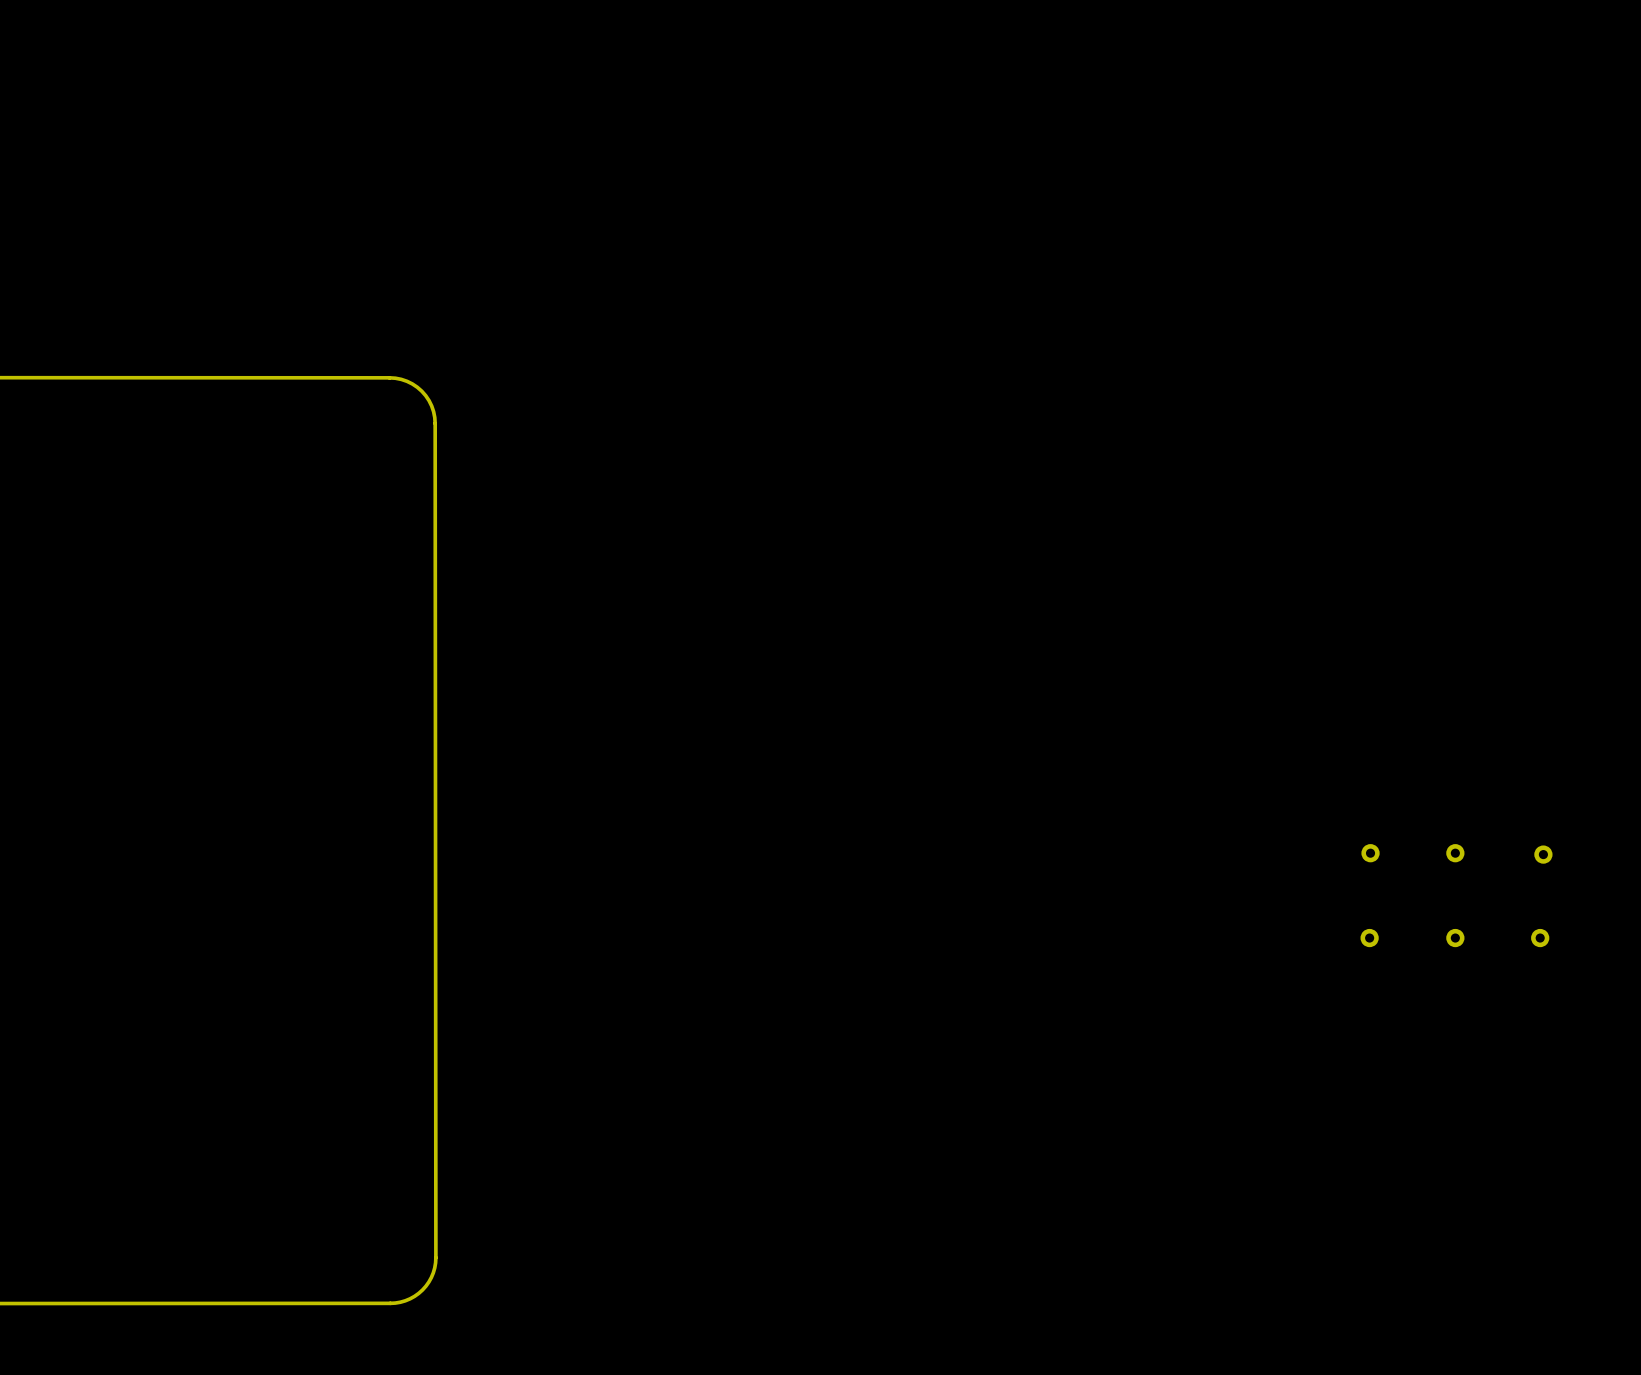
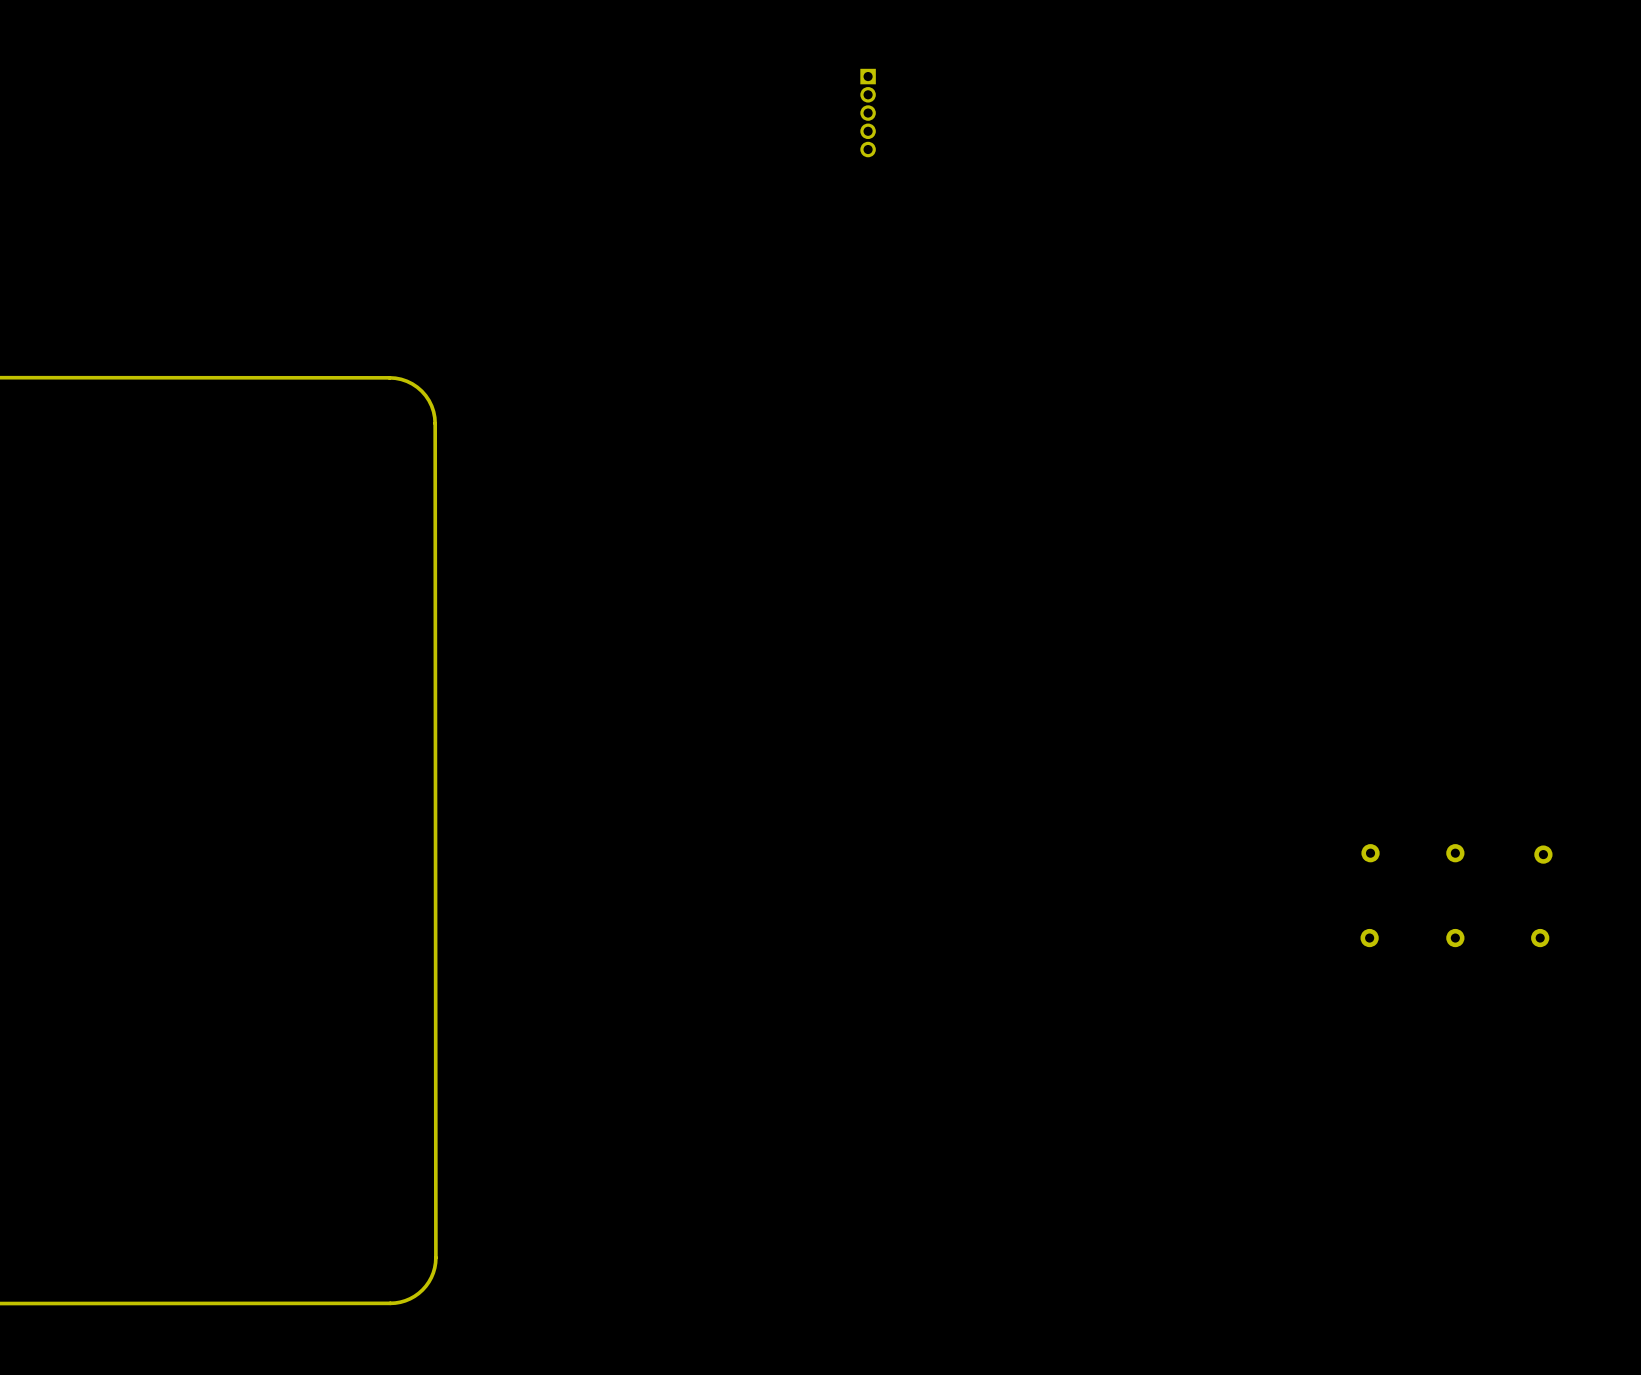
part: none -> (868, 113)

